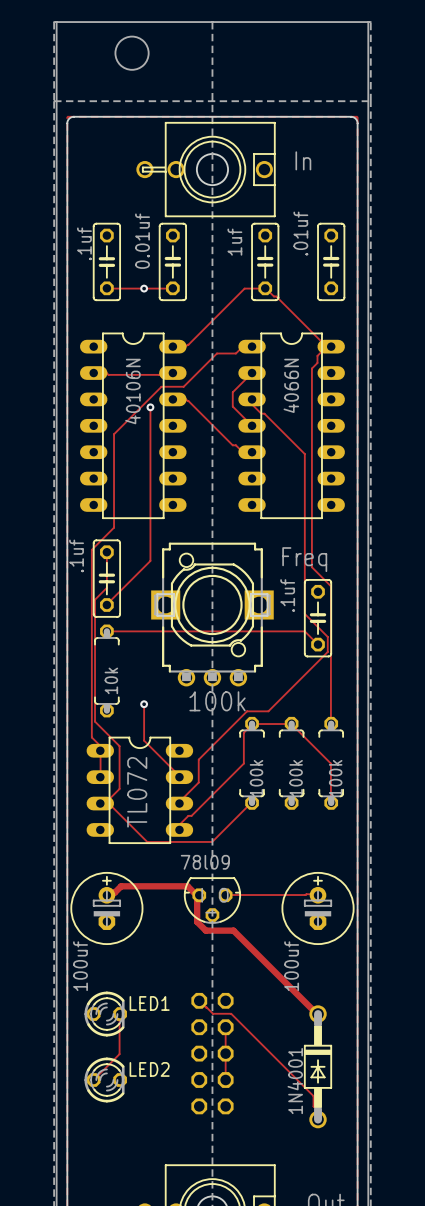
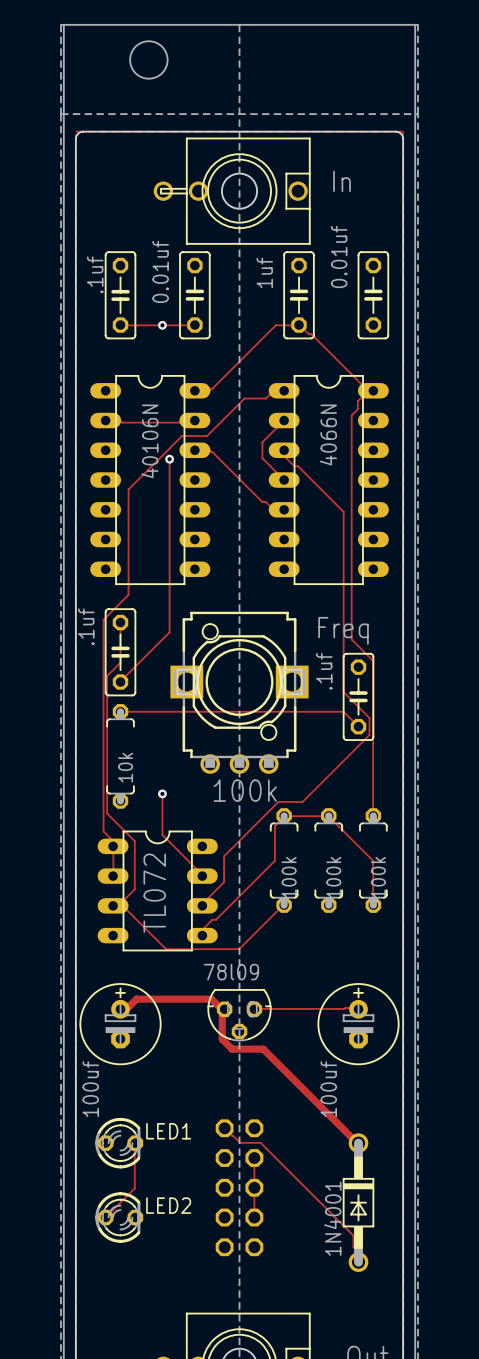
part value: .01uf (300, 233) -> 0.01uf (339, 257)

